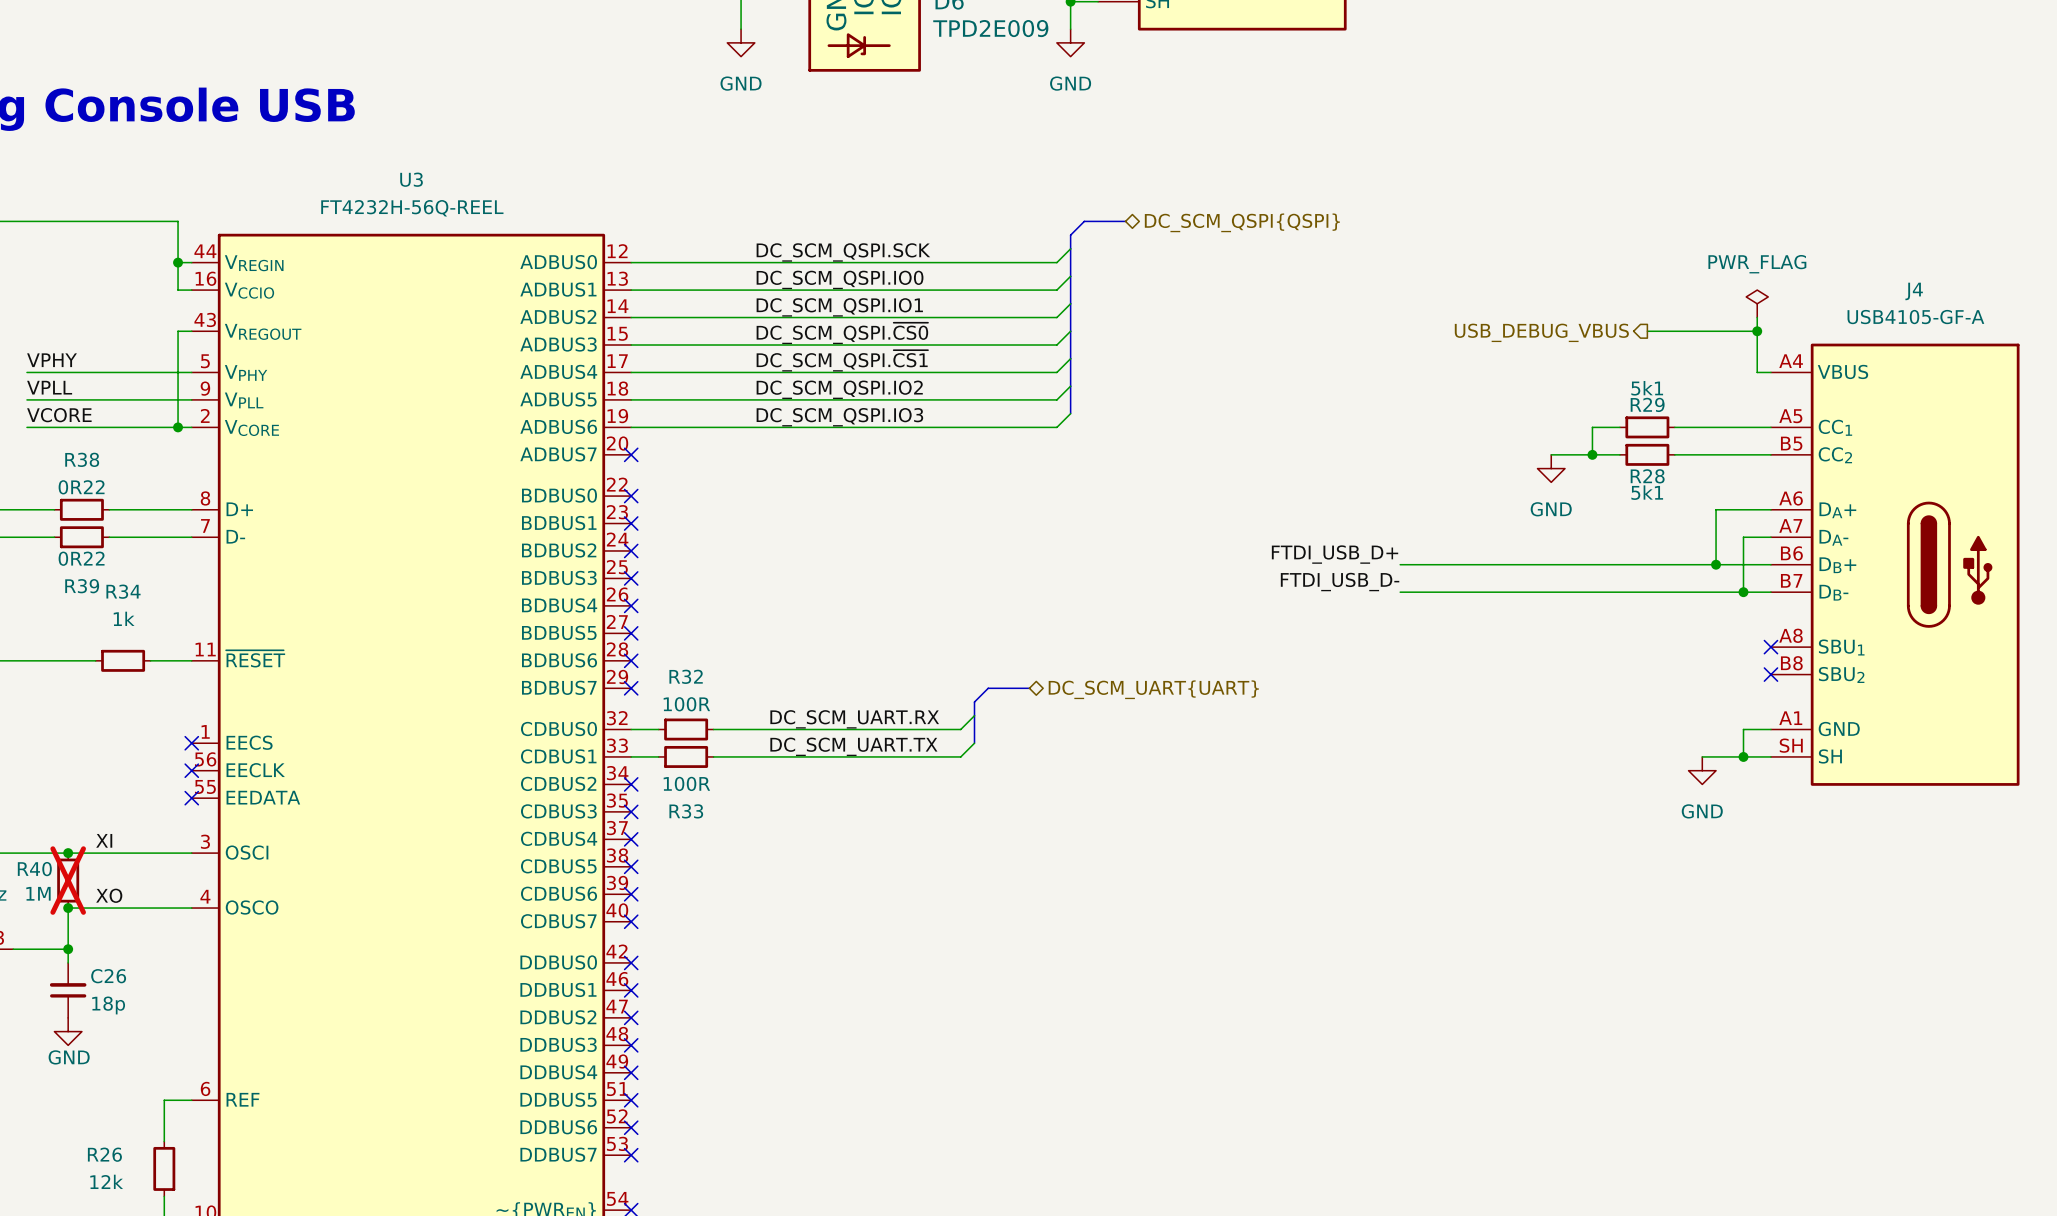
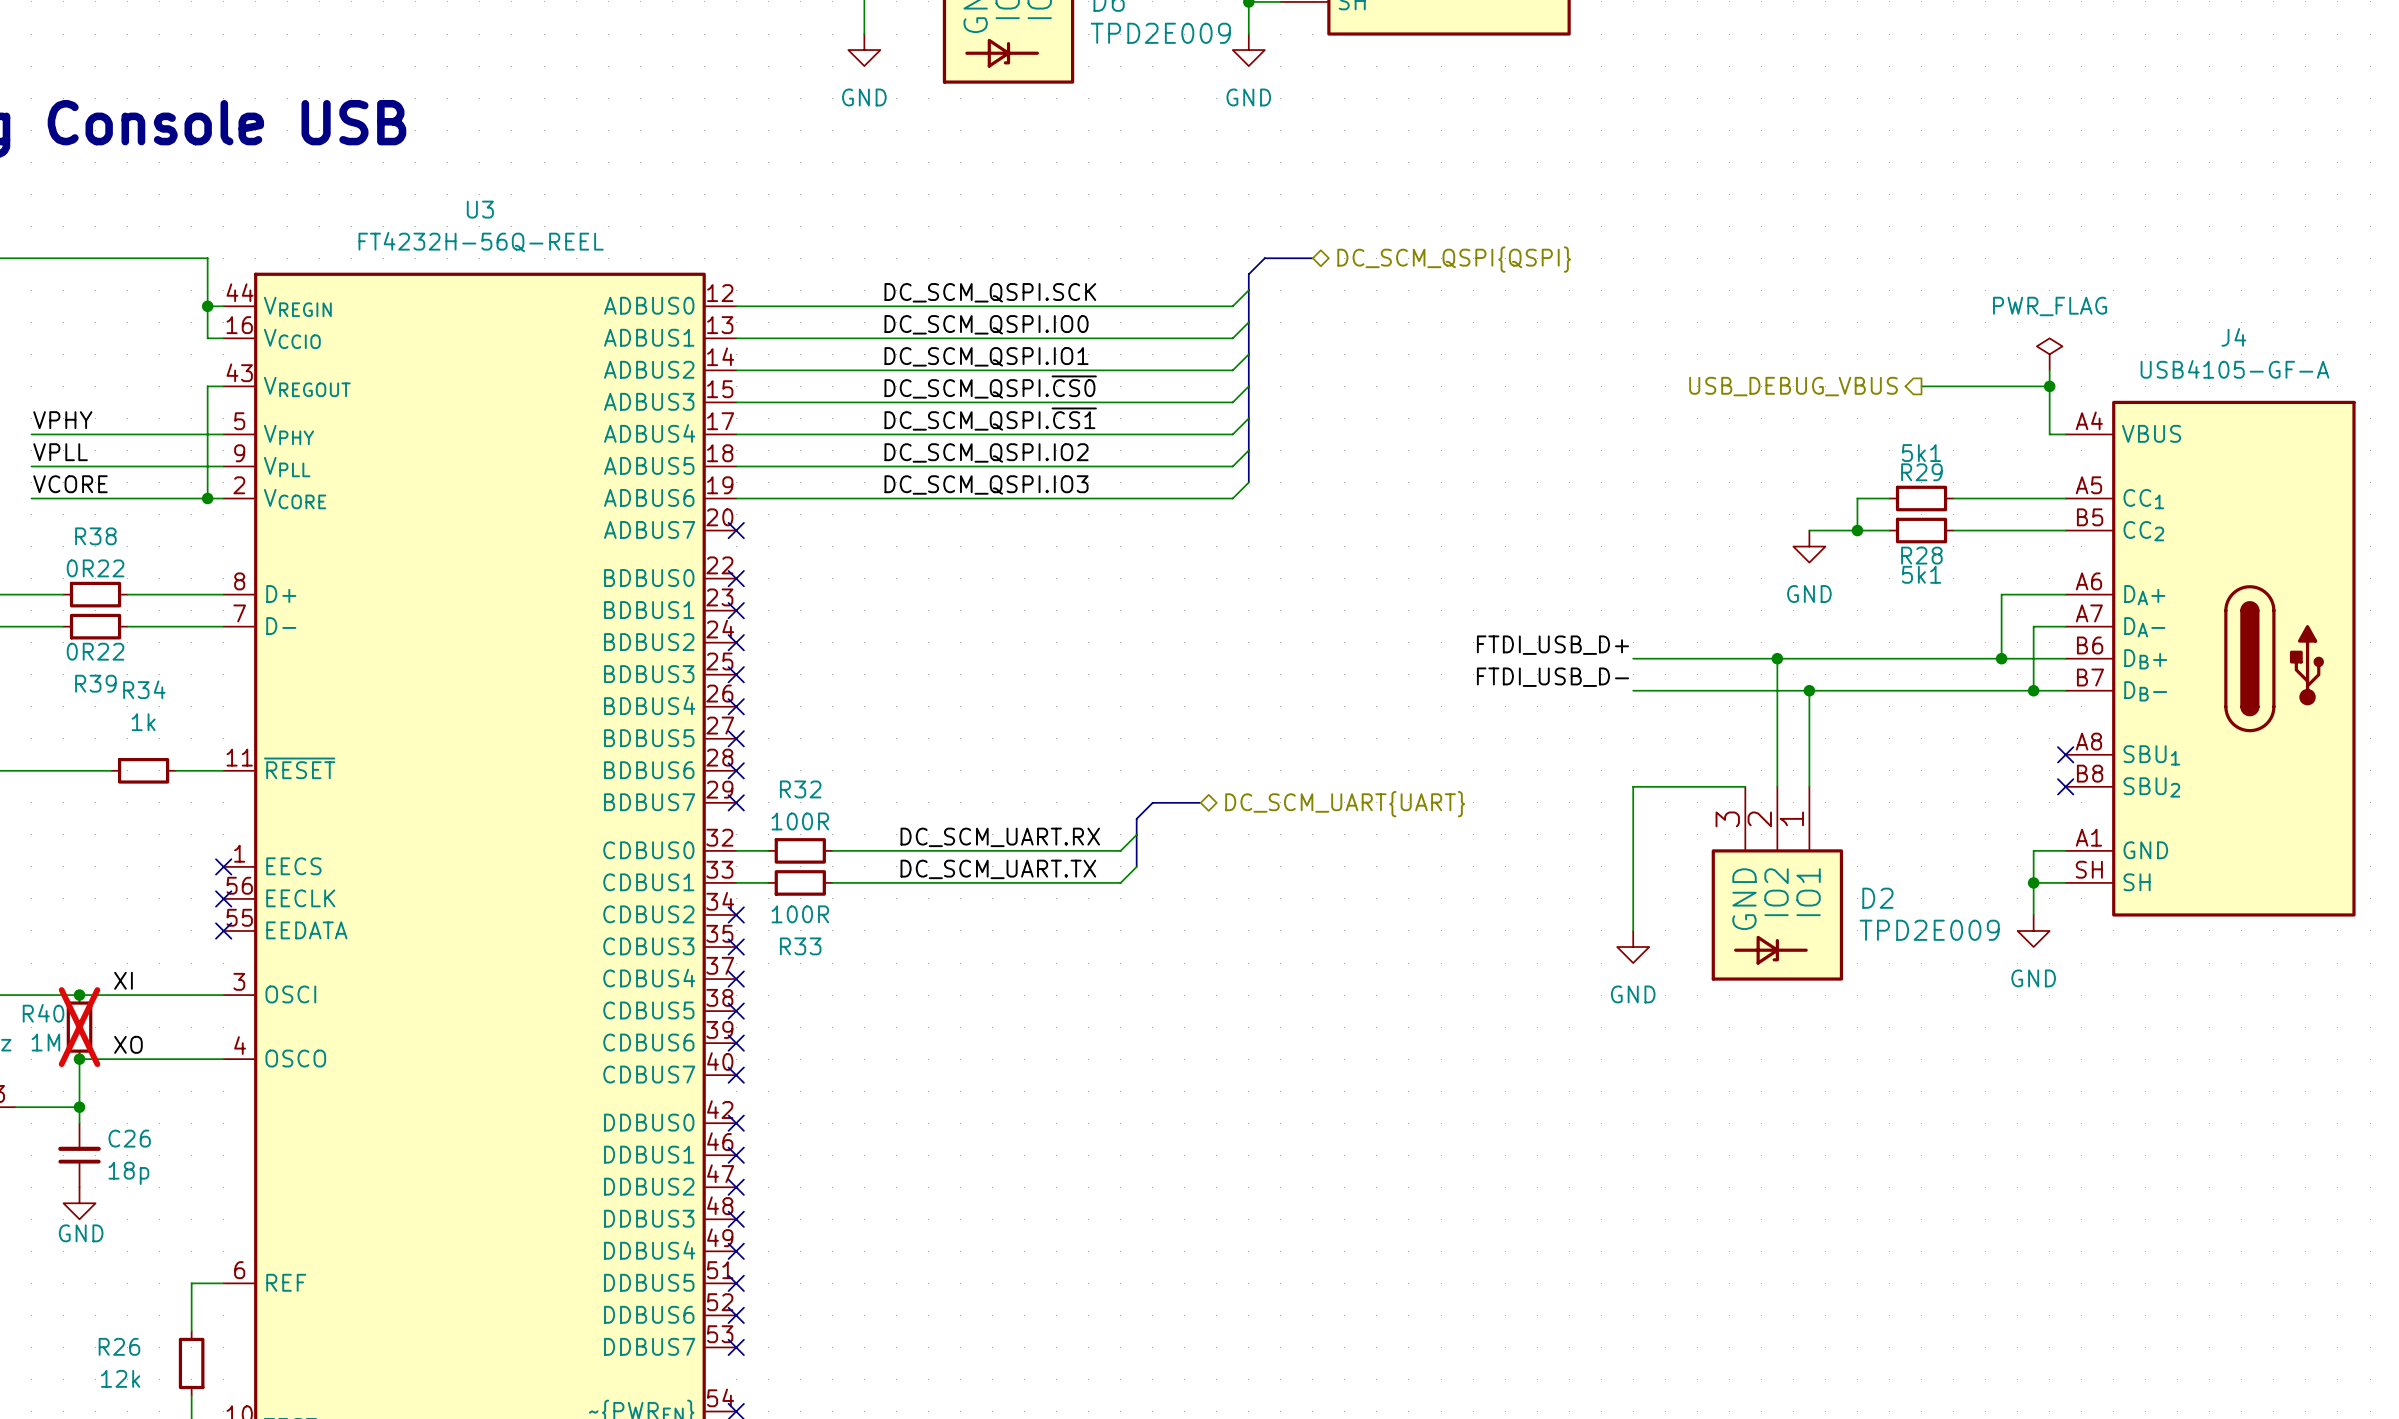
wire: none -> (1777, 658) (1777, 786)
junction: none -> (1777, 658)
wire: none -> (1809, 690) (1809, 786)
junction: none -> (1809, 690)
wire: none -> (1745, 786) (1633, 786) (1633, 930)
wire: (1702, 756) (1743, 756) -> (2033, 914) (2033, 882)
D2: none -> TPD2E009 (1777, 883)
power symbol position: GND (1702, 770) -> GND (2033, 930)
power symbol: none -> GND (1633, 947)

